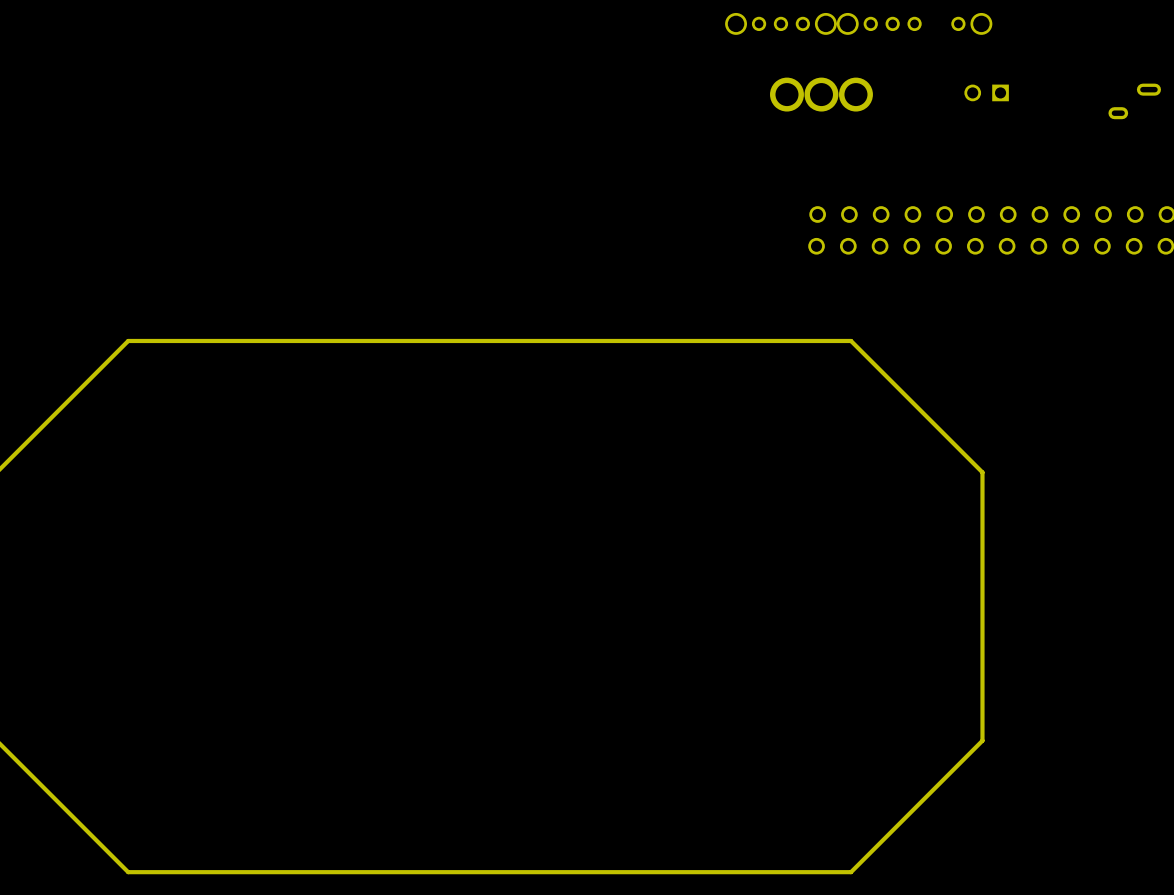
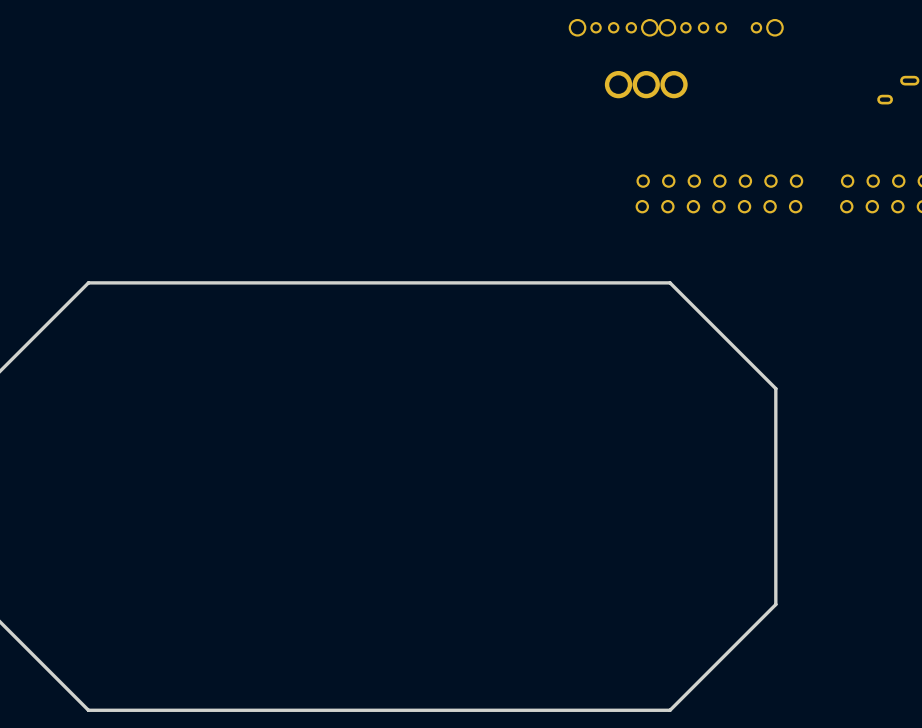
part: (986, 92) -> none
part: (1039, 214) -> none
part: (1038, 246) -> none

